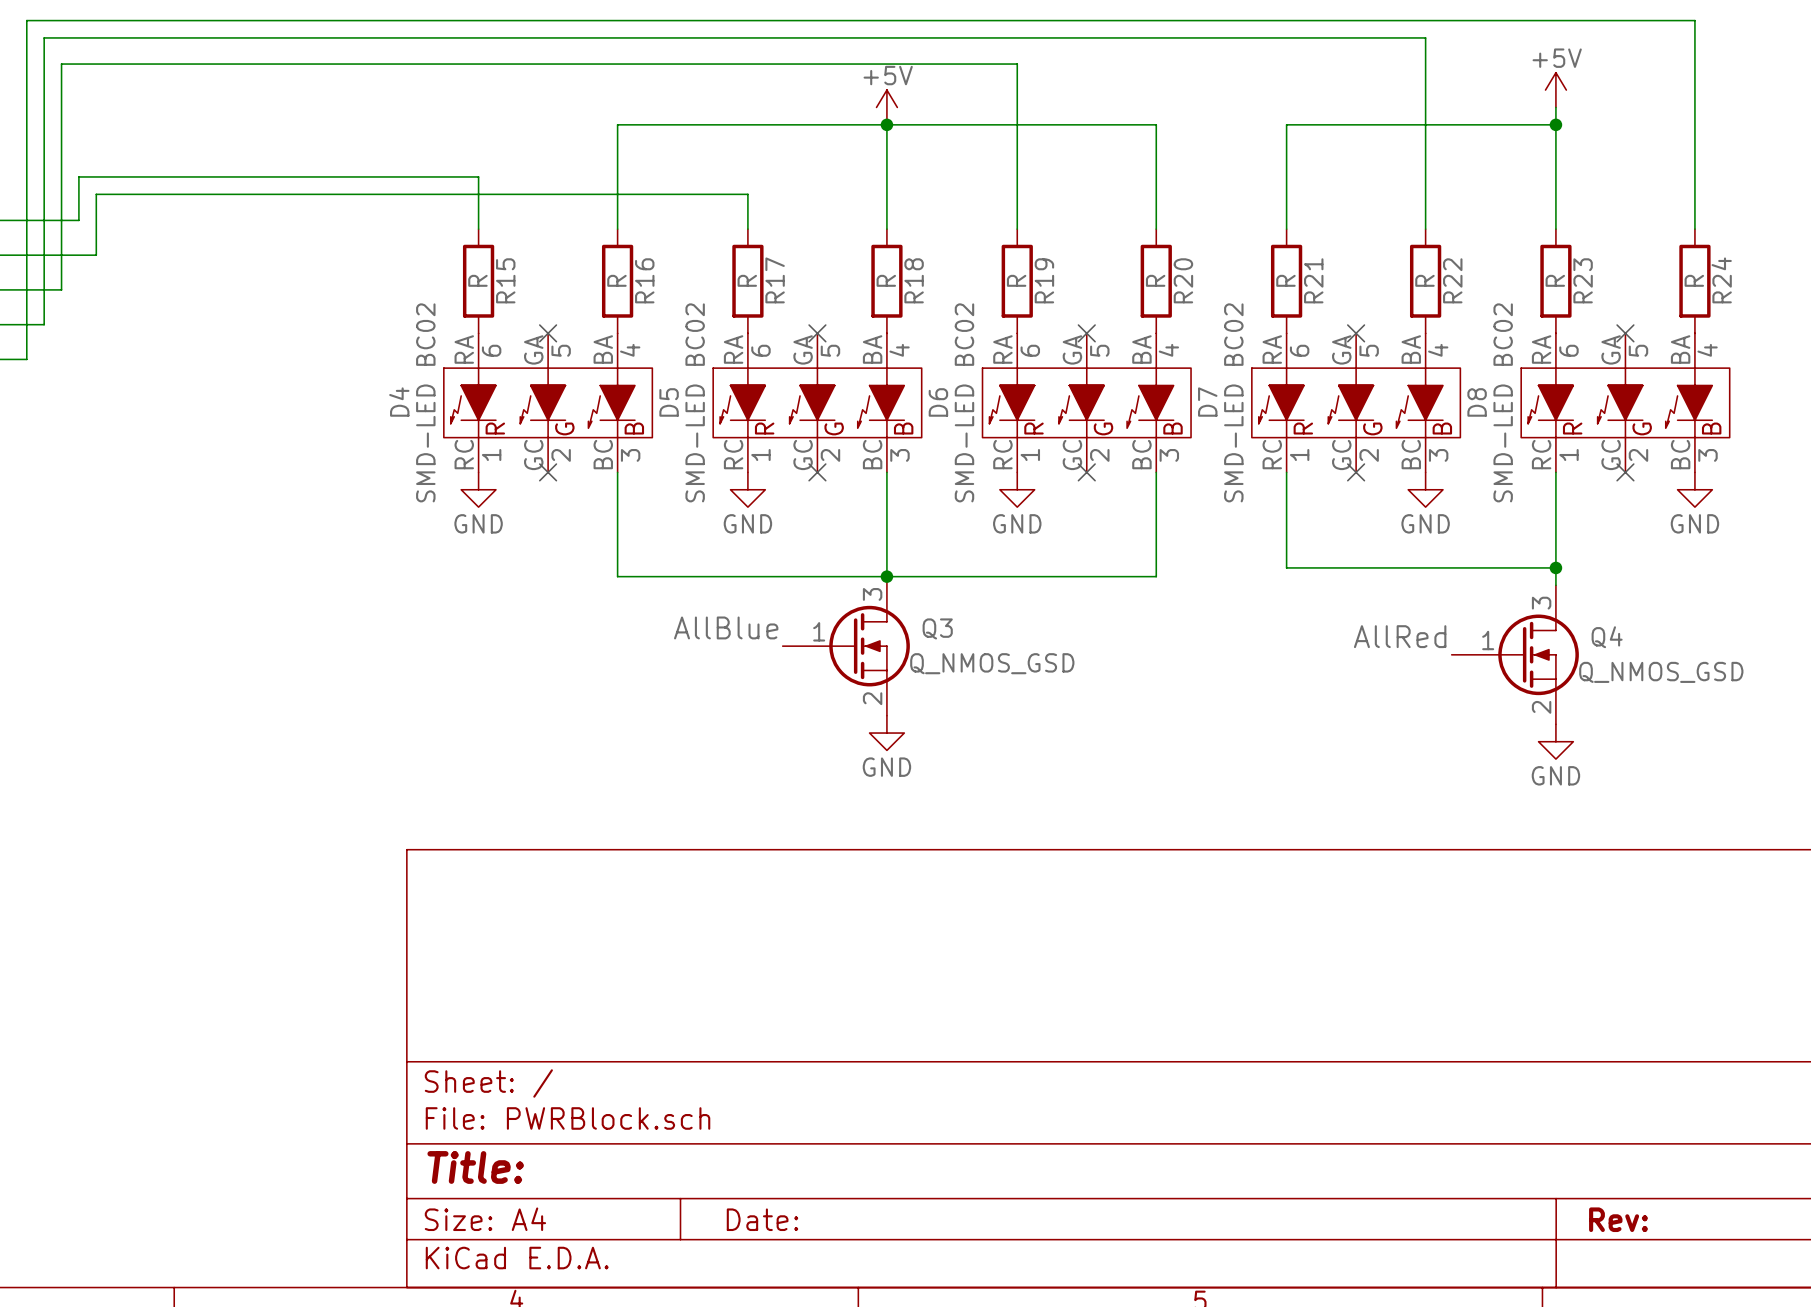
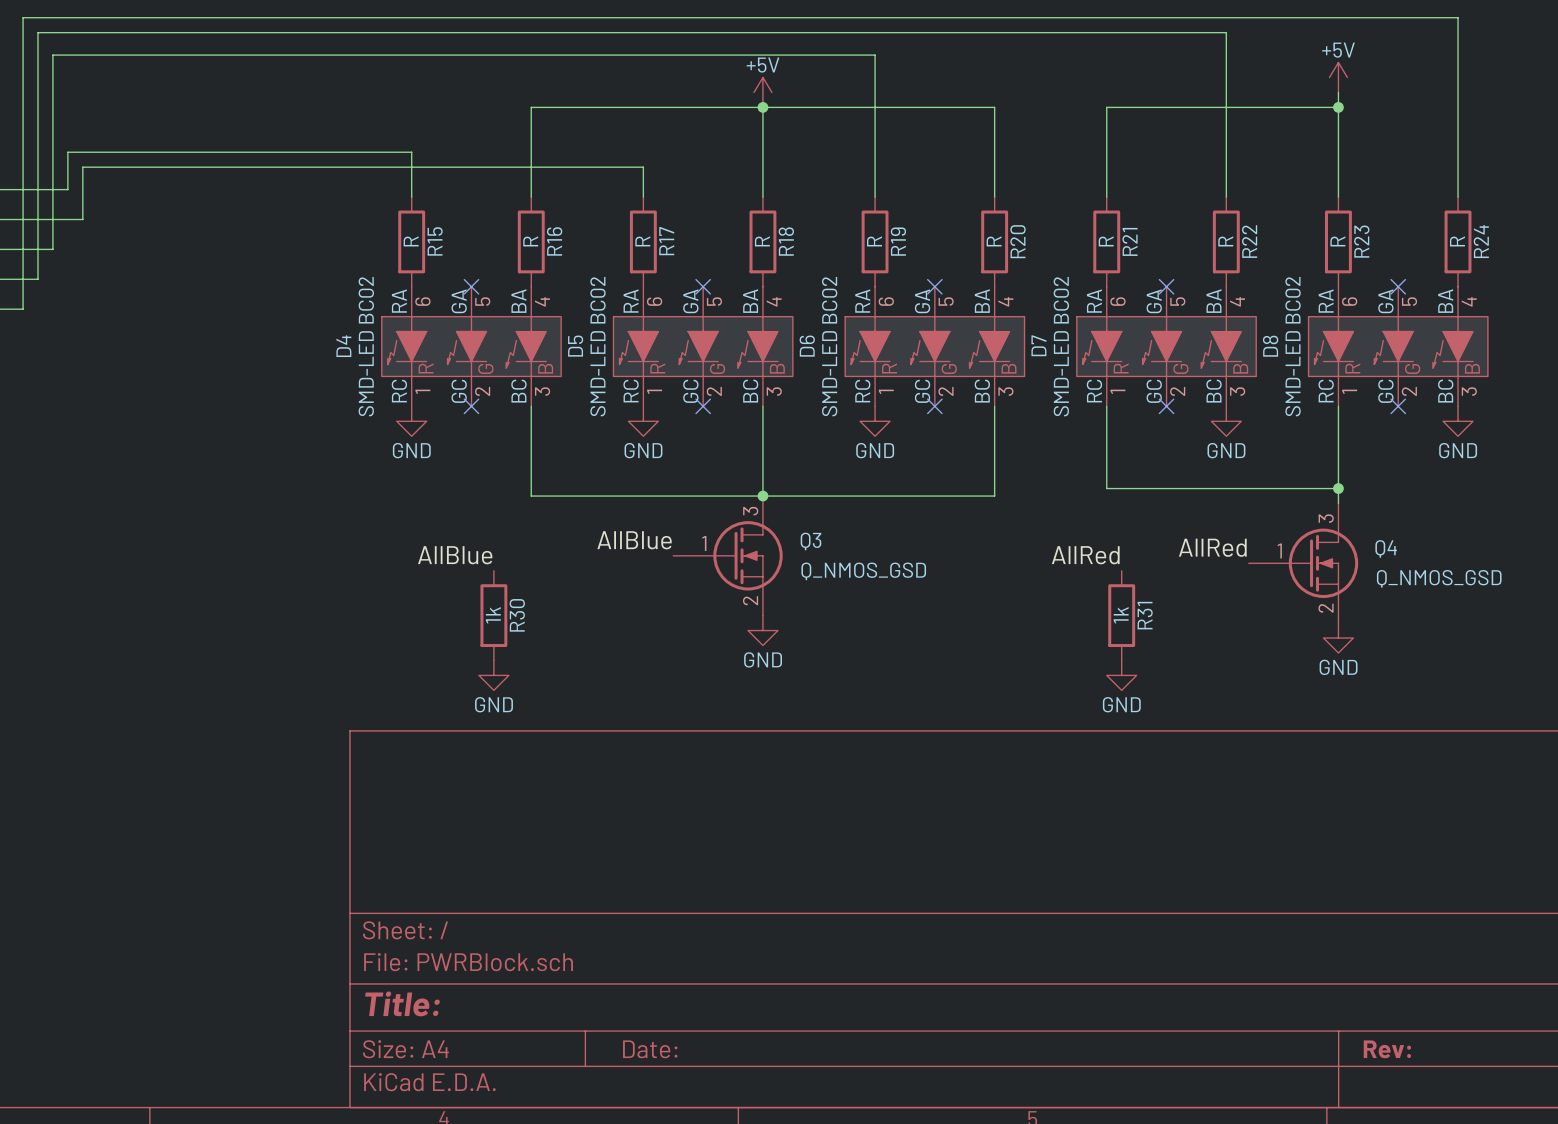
label: none -> AllBlue (455, 555)
label: none -> AllRed (1085, 555)
R30: none -> 1k (493, 615)
R31: none -> 1k (1121, 615)
power symbol: none -> GND (493, 675)
power symbol: none -> GND (1121, 675)

